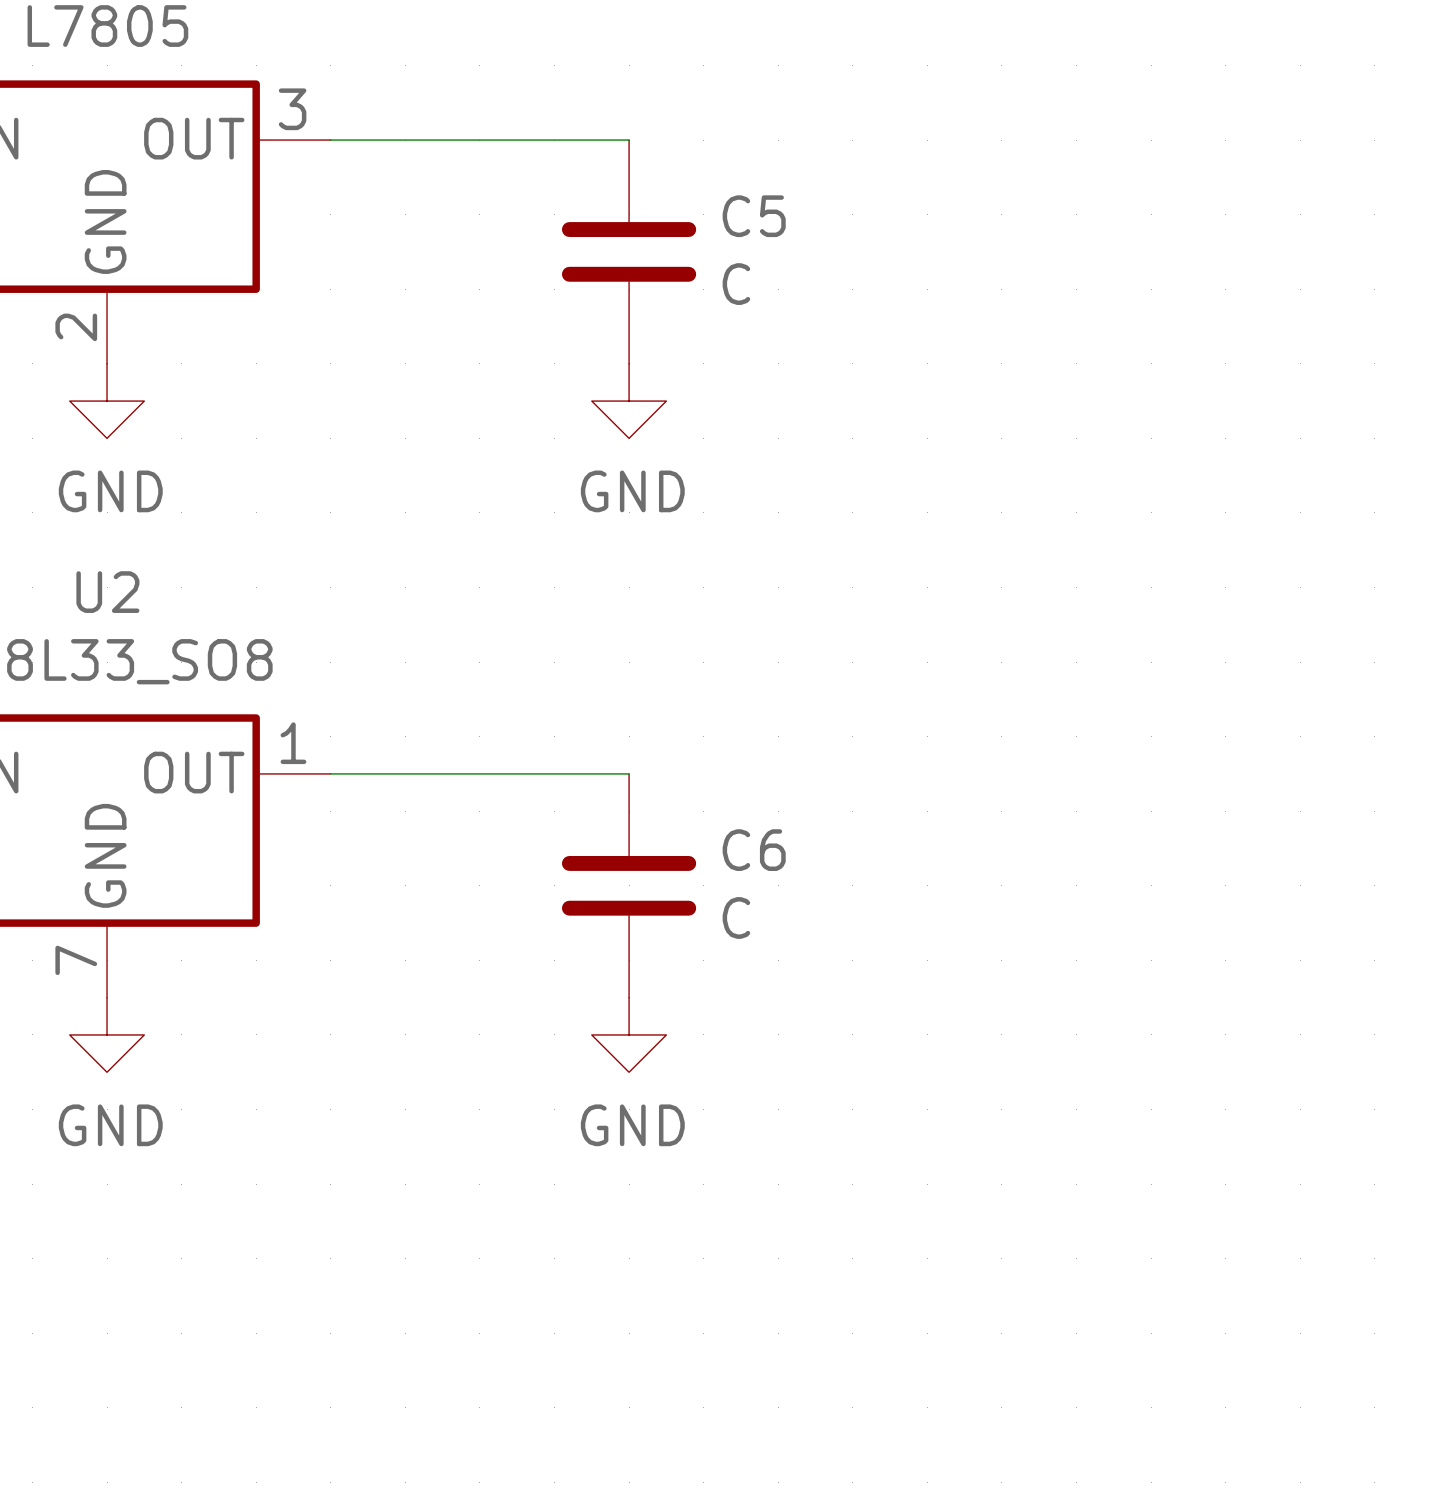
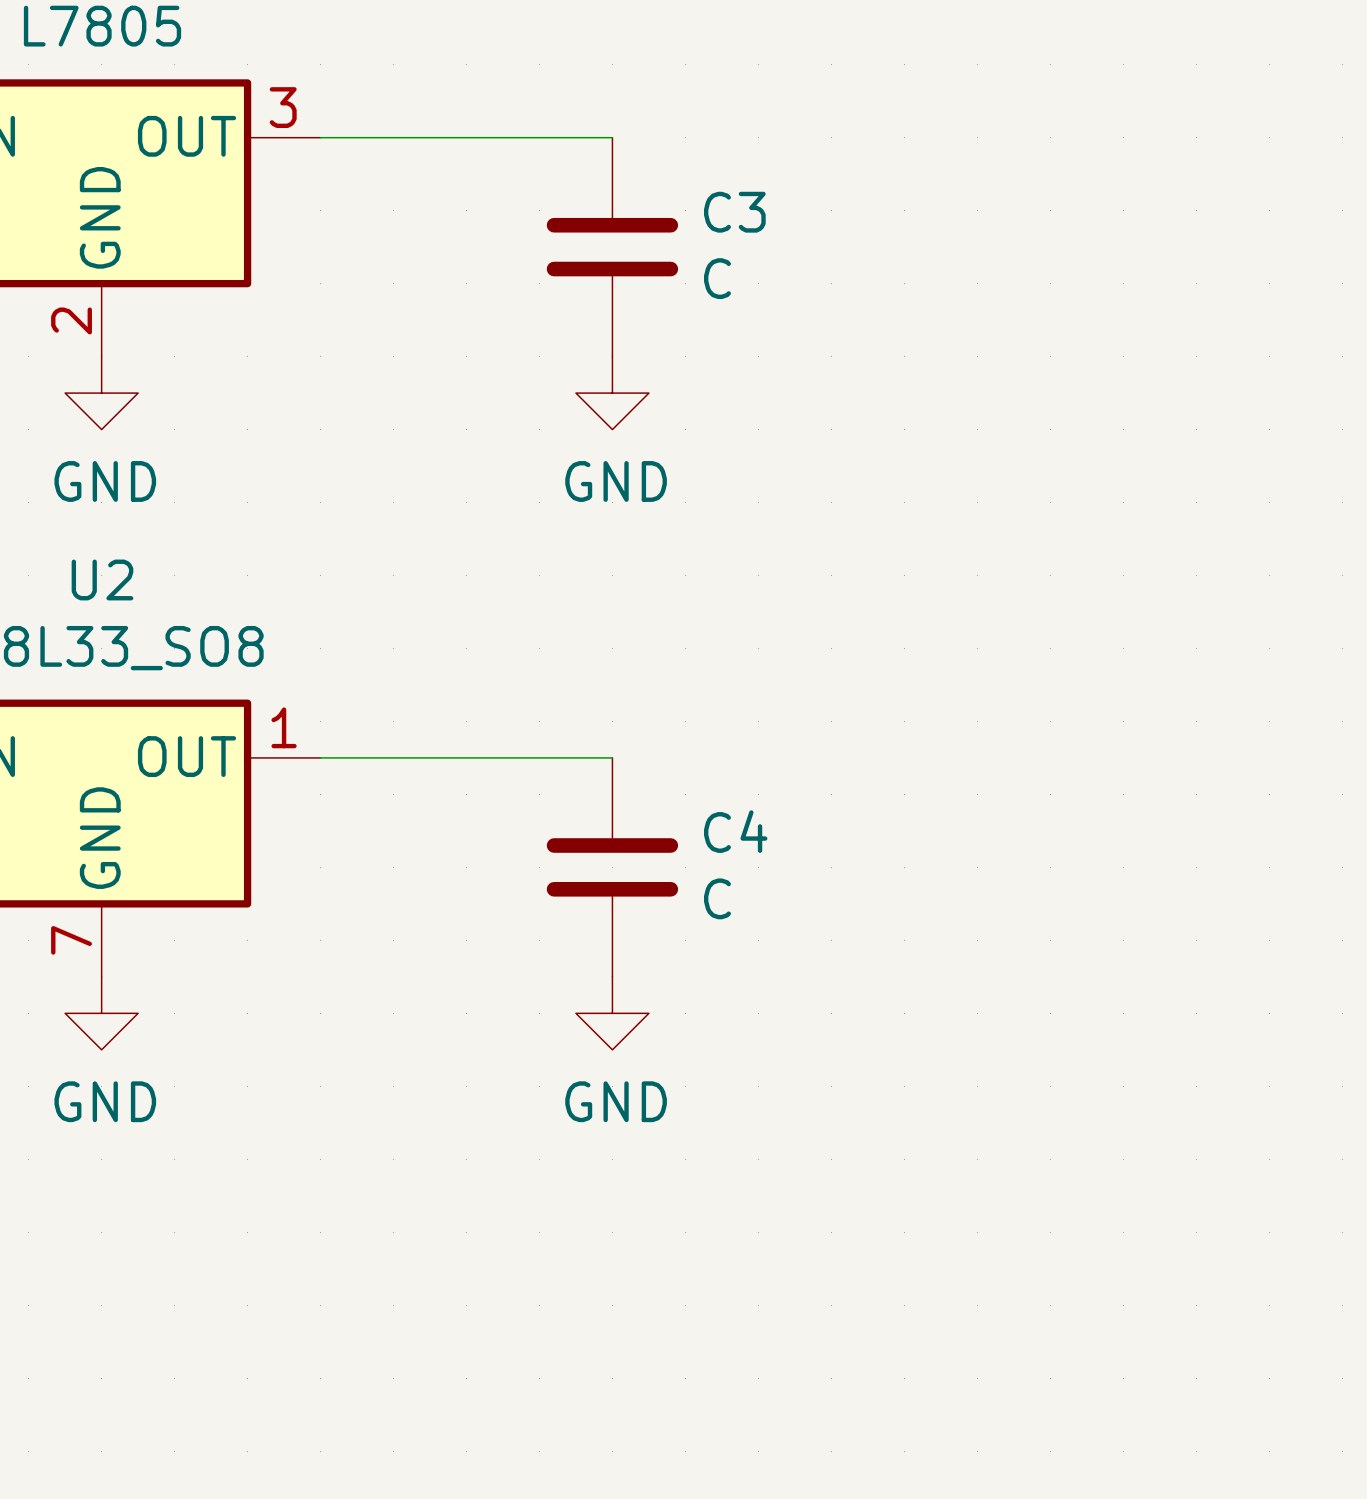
C5 name: C5 (754, 216) -> C3 (734, 212)
C6 name: C6 (754, 850) -> C4 (735, 831)

